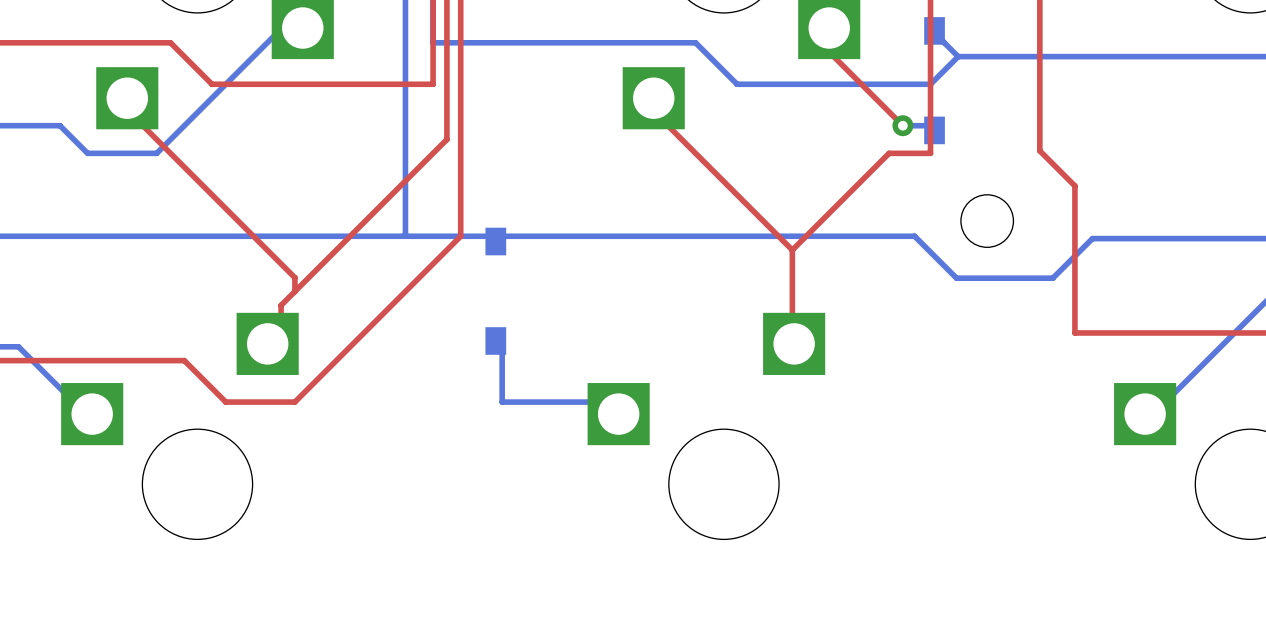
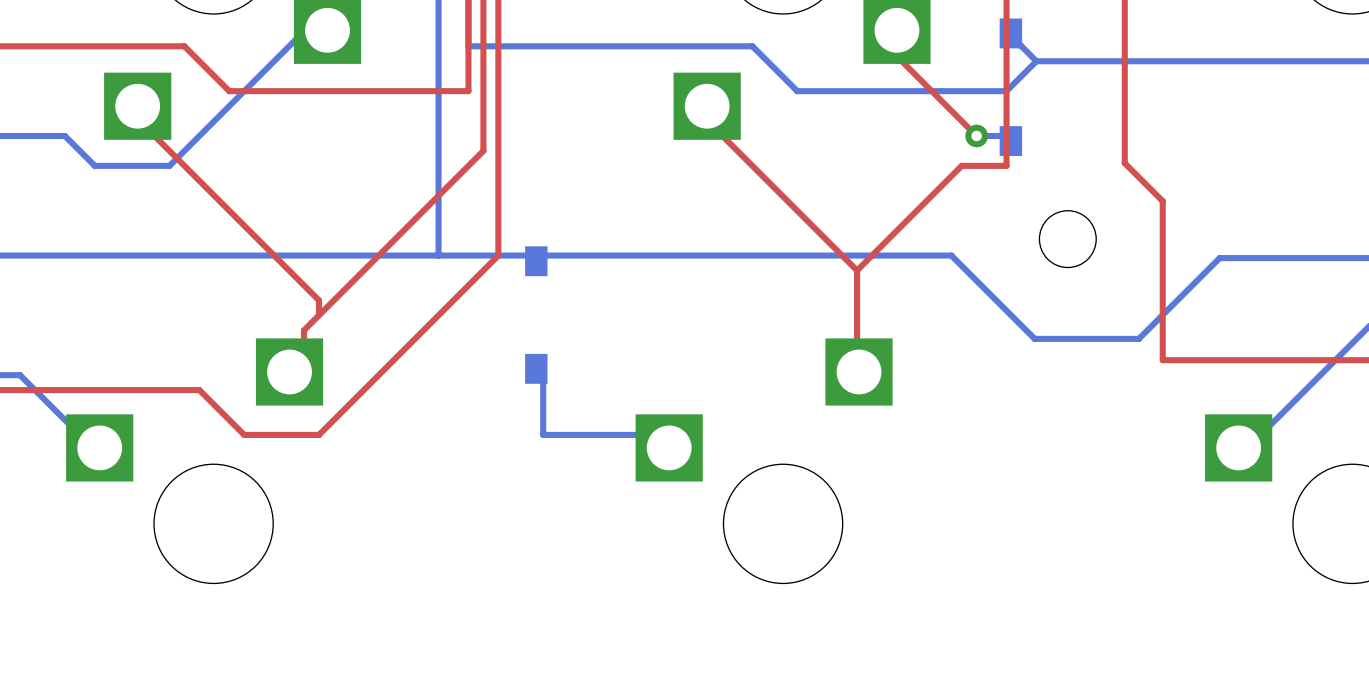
bottom track: (879, 236) (914, 236) (956, 278) (1052, 278) (1092, 238) (1127, 238) -> (951, 255) (1034, 338) (1138, 338) (1219, 258)

